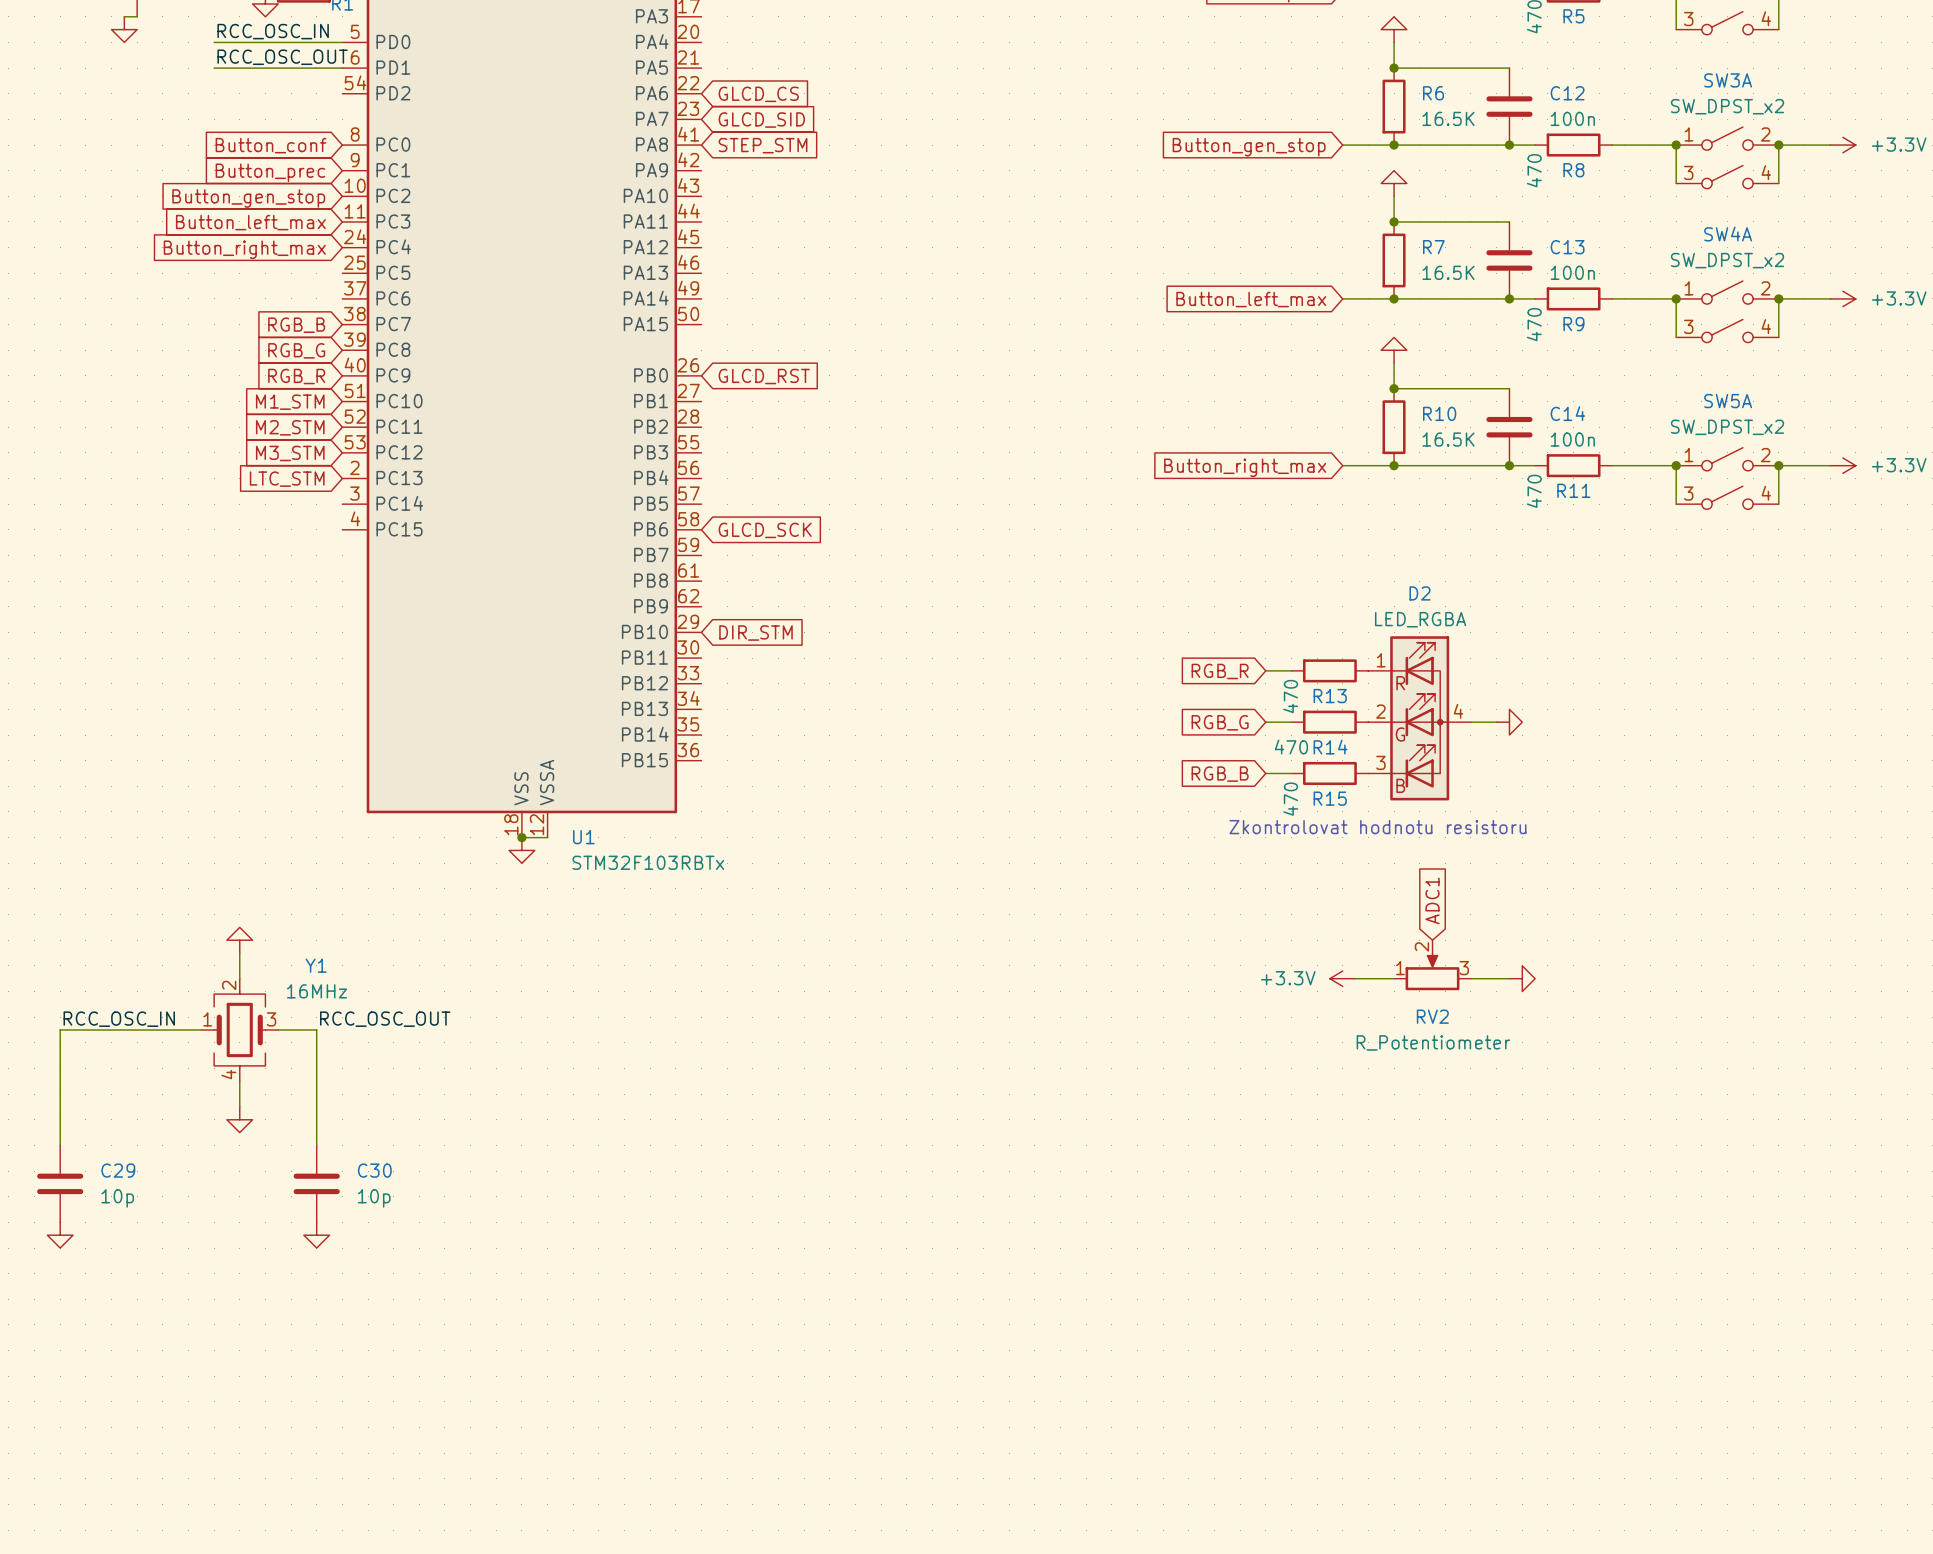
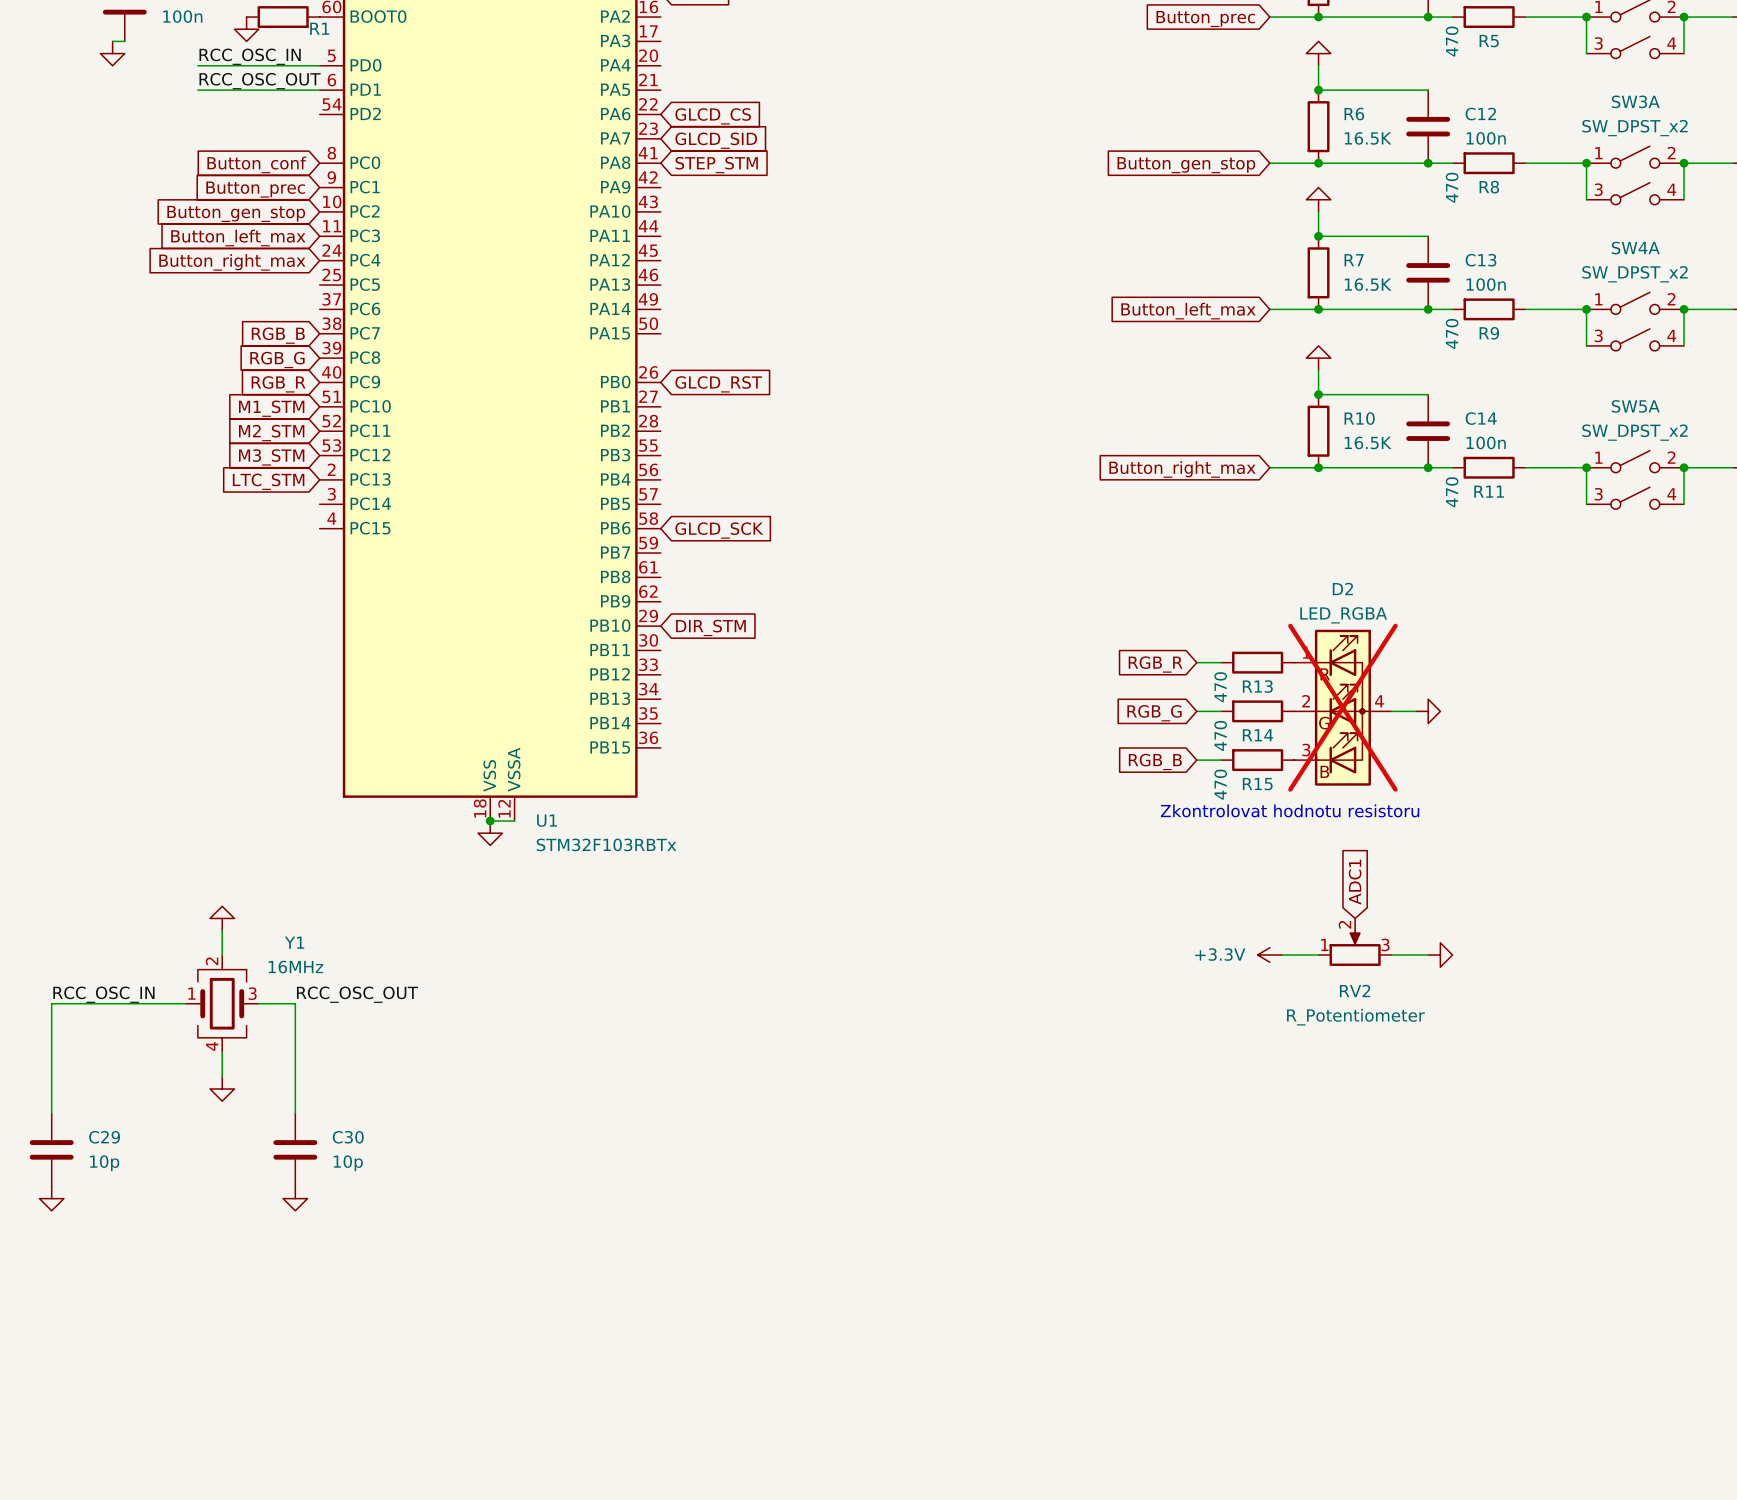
D2 do-not-place cross: none -> (1342, 707)
R14 value rotation: 0° (1291, 747) -> 90° counterclockwise (1220, 735)

